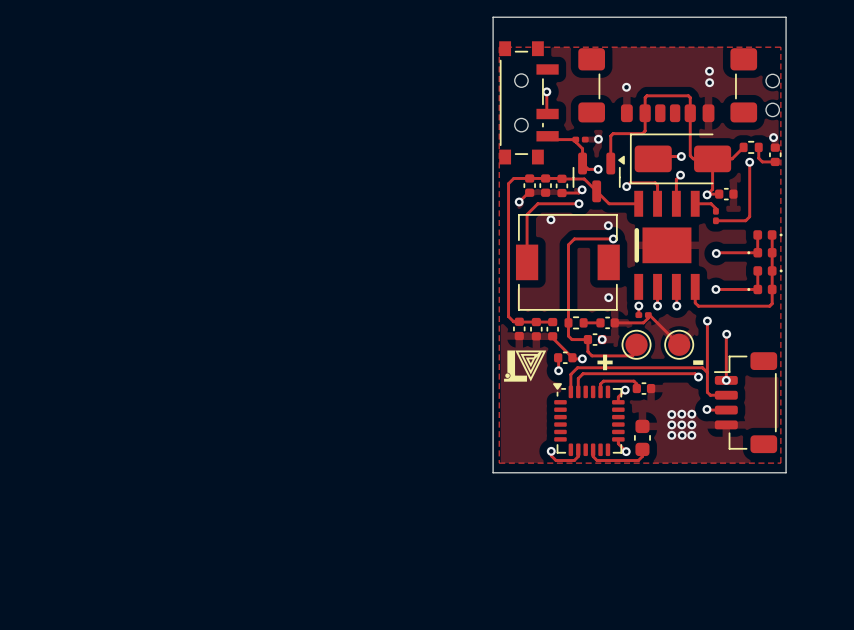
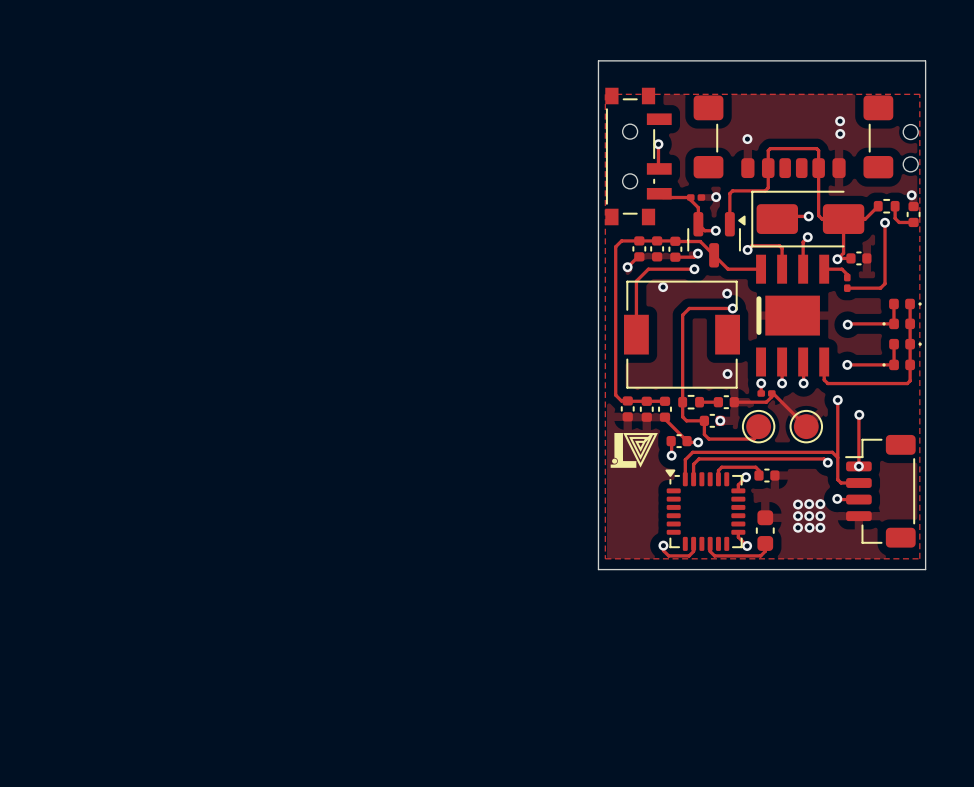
text: + (605, 362) -> none
text: - (698, 362) -> none

